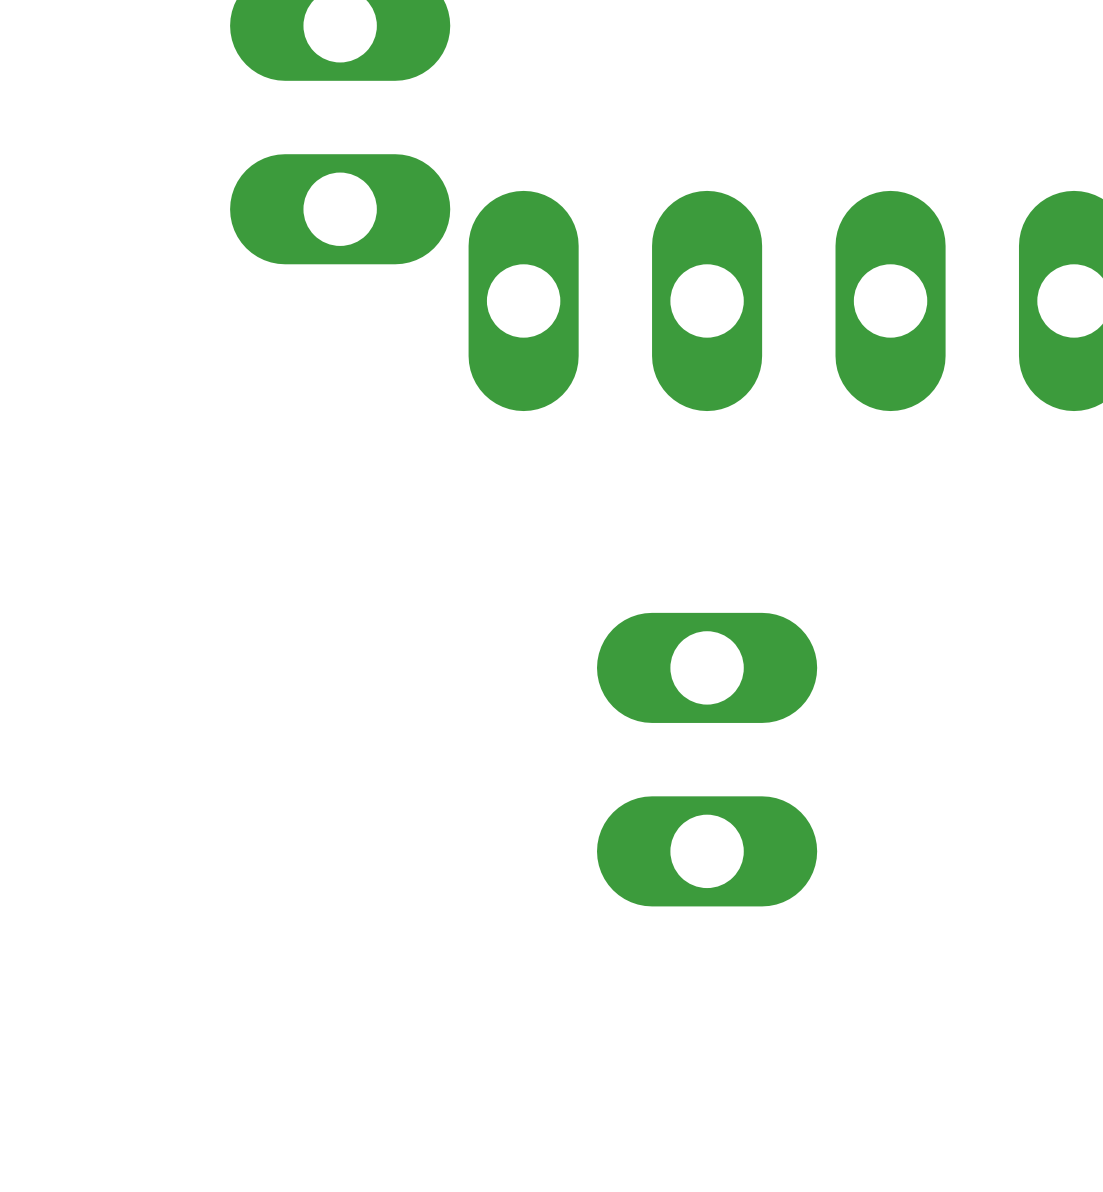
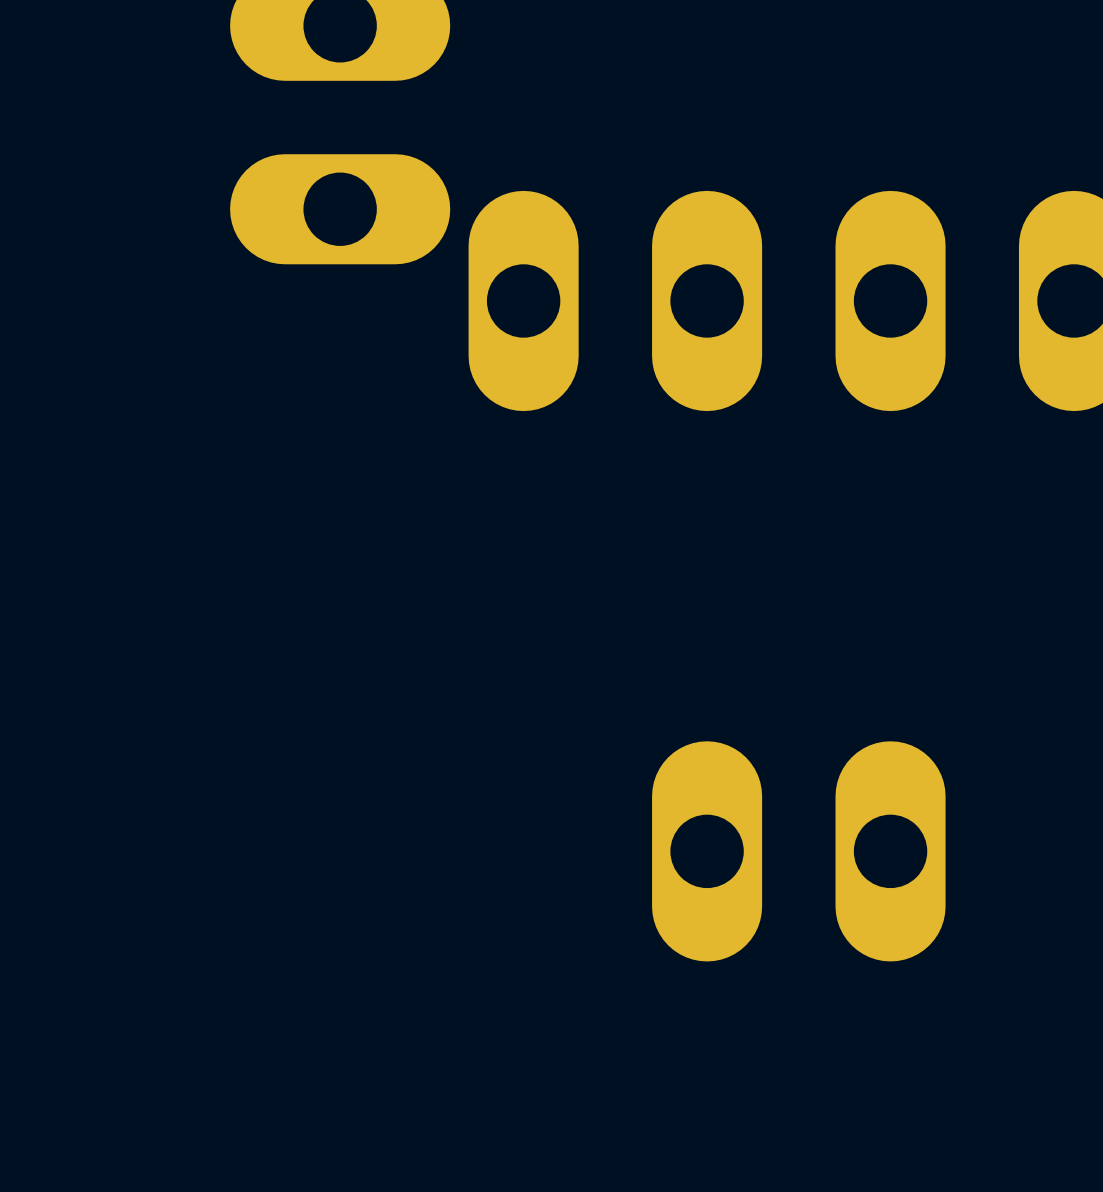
part rotation: 0° (707, 759) -> 90° clockwise (798, 851)

